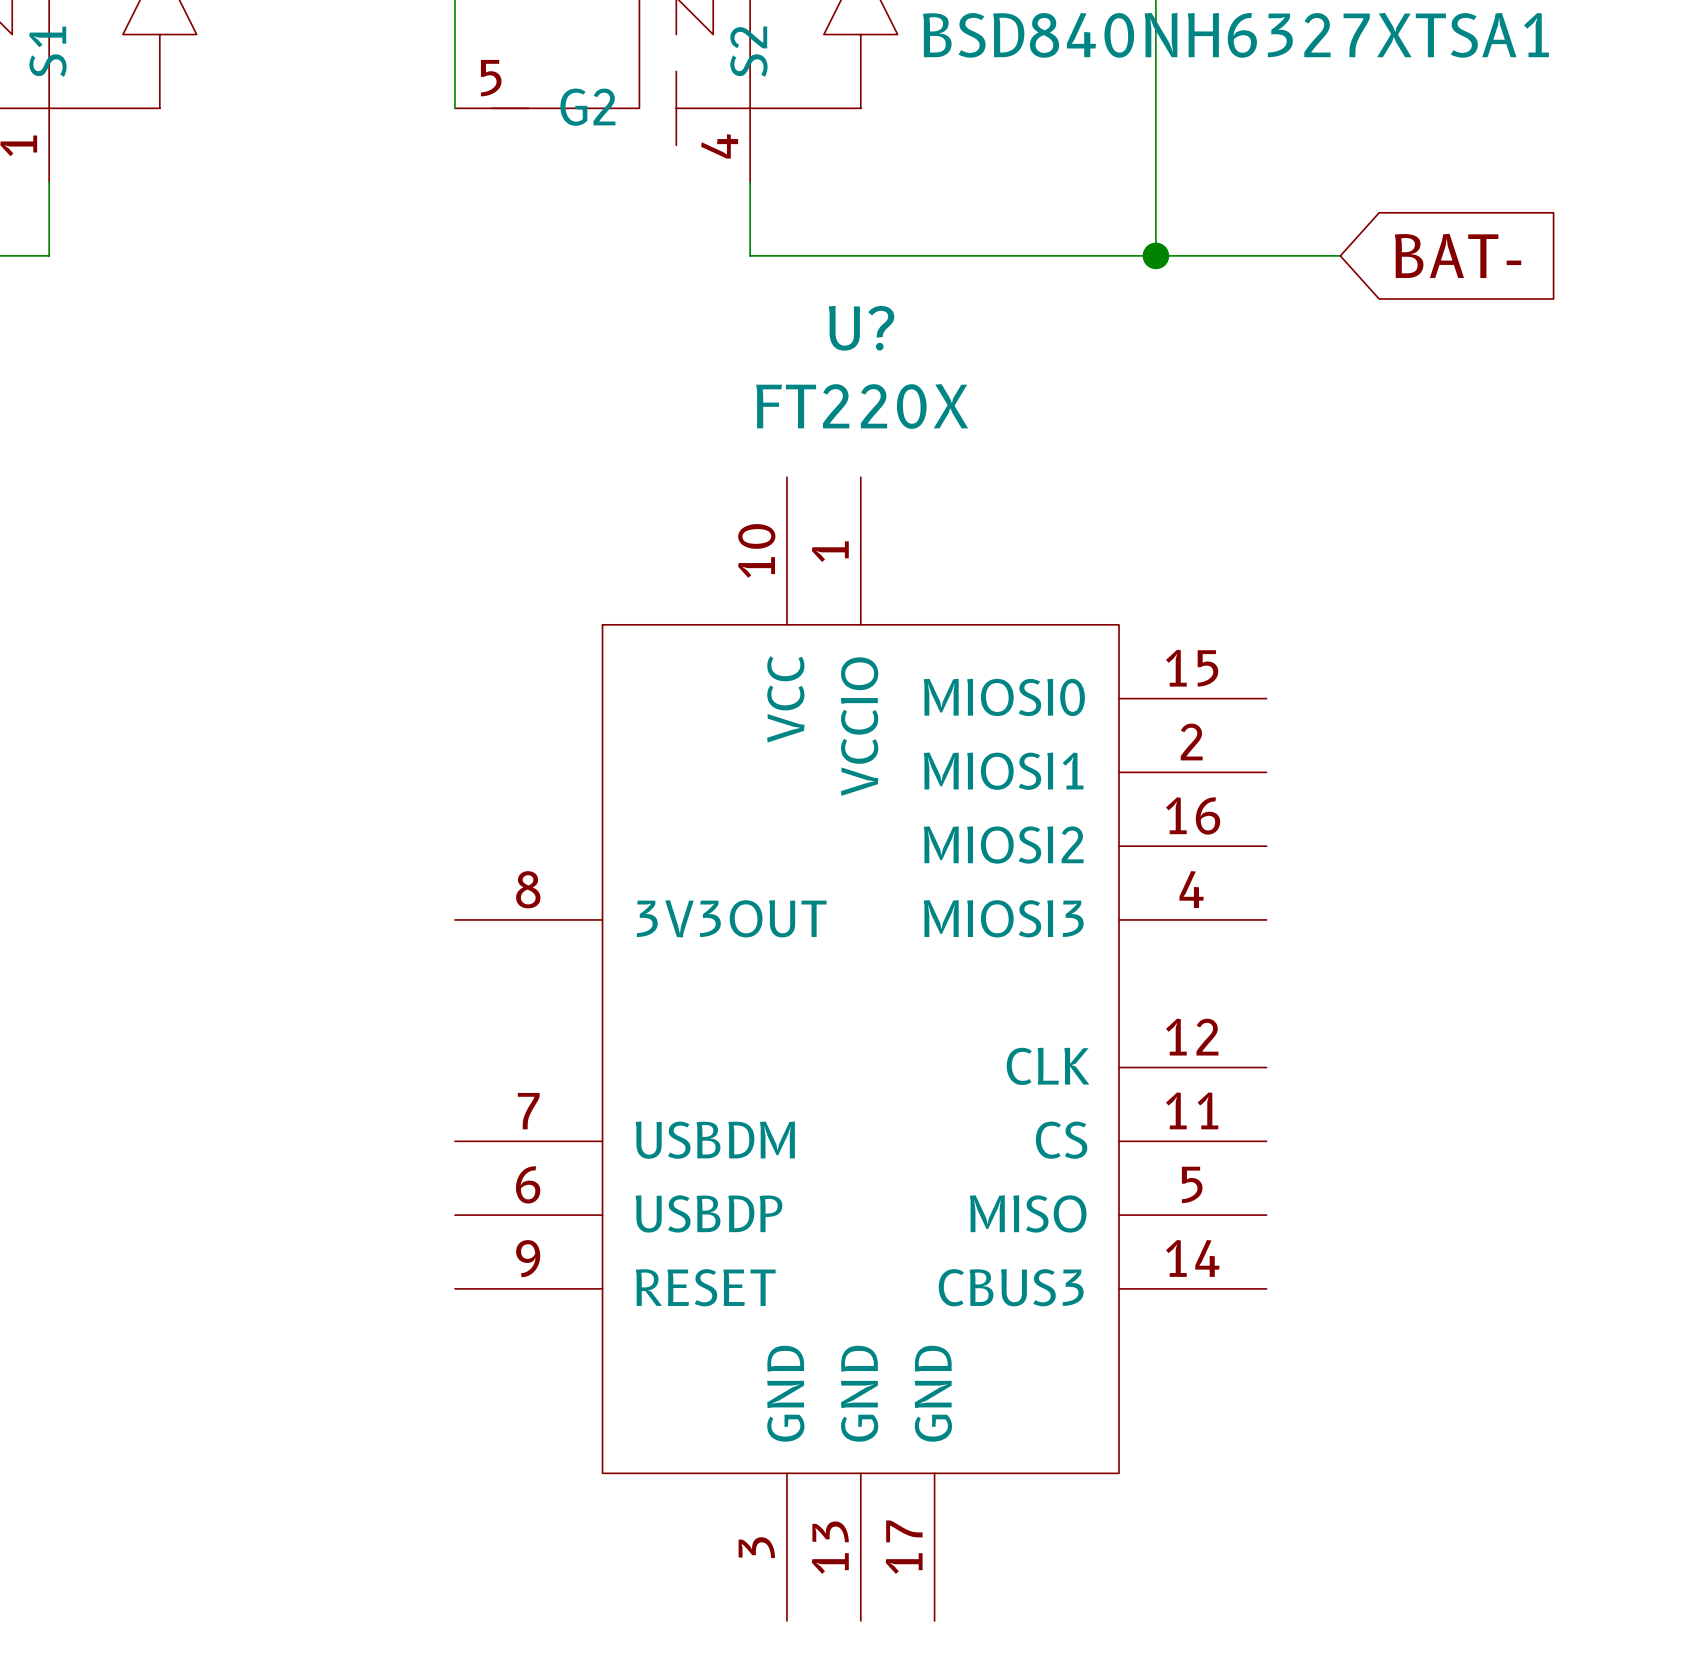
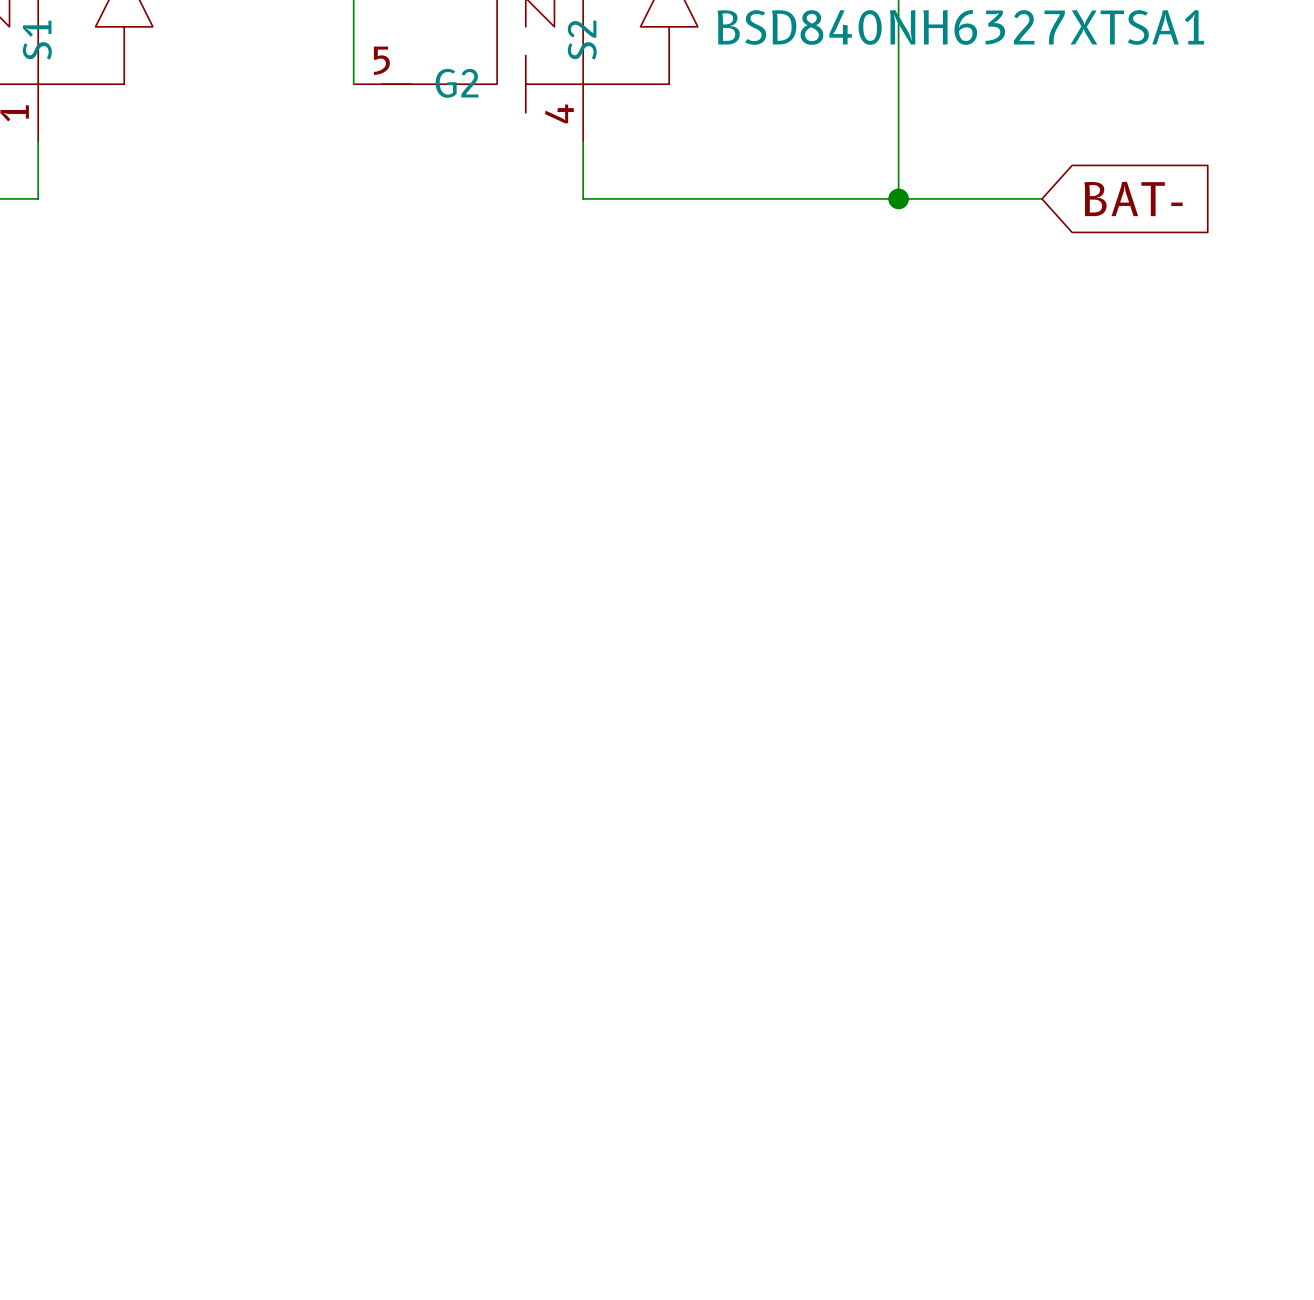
U?: FT220X (860, 1049) -> none

